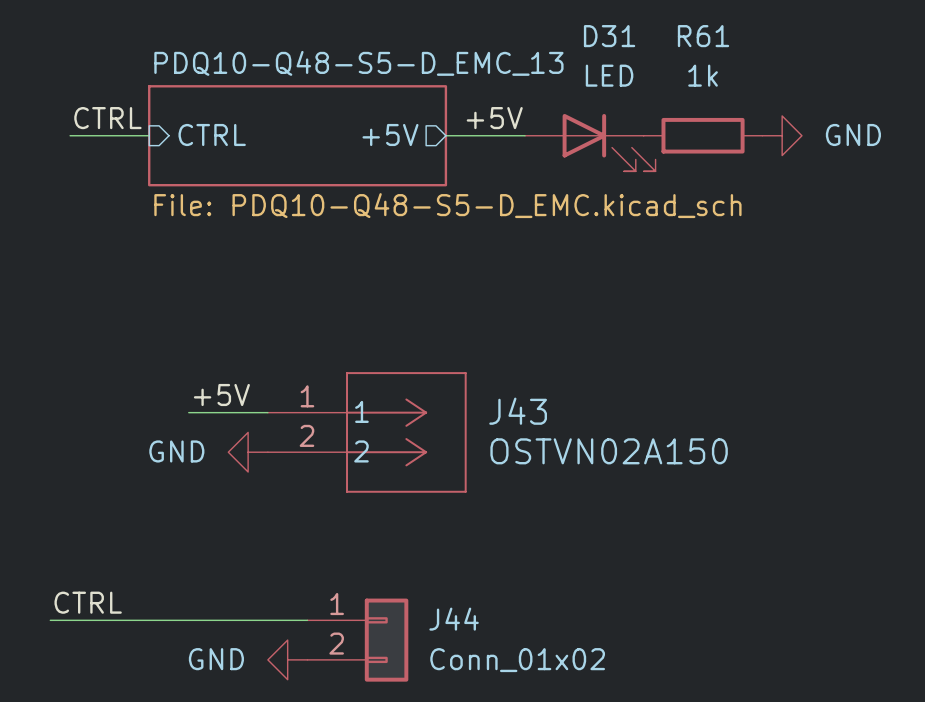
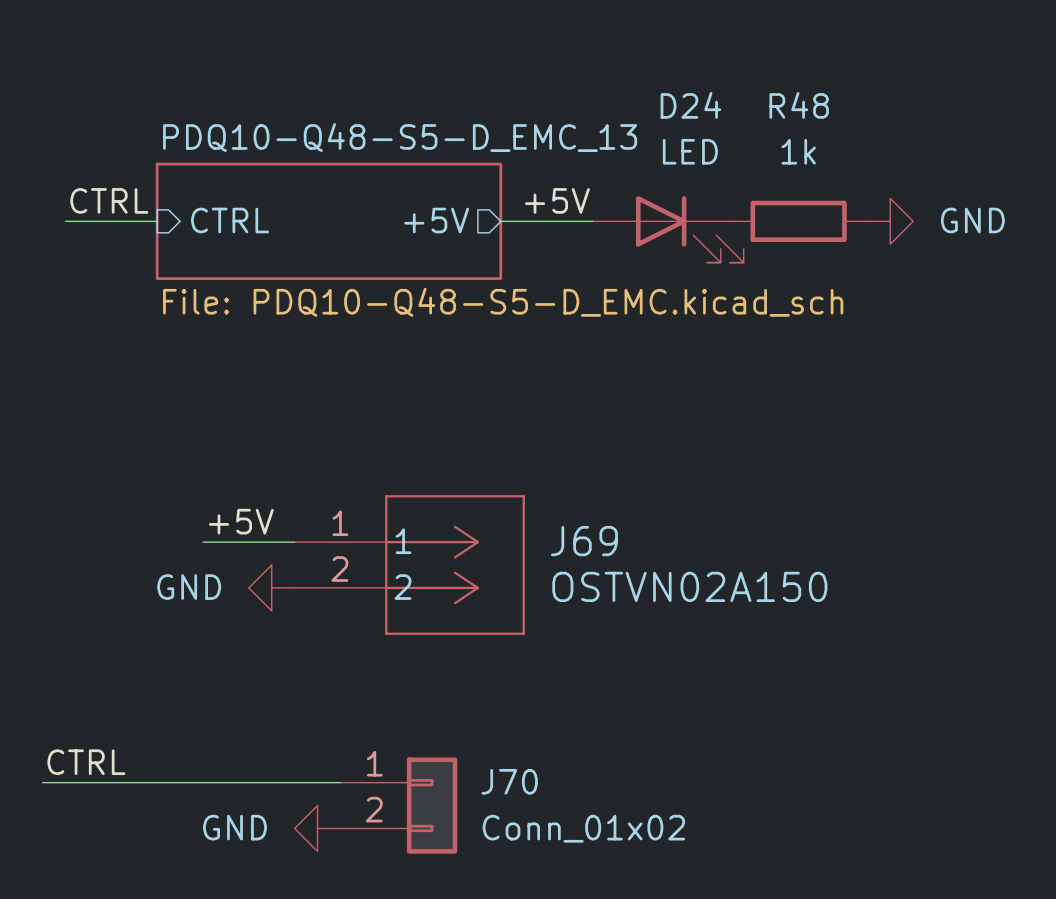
D31 name: D31 (609, 36) -> D24 (690, 105)
R61 name: R61 (703, 36) -> R48 (799, 105)
J43 name: J43 (518, 411) -> J69 (584, 541)
J44 name: J44 (454, 619) -> J70 (509, 781)

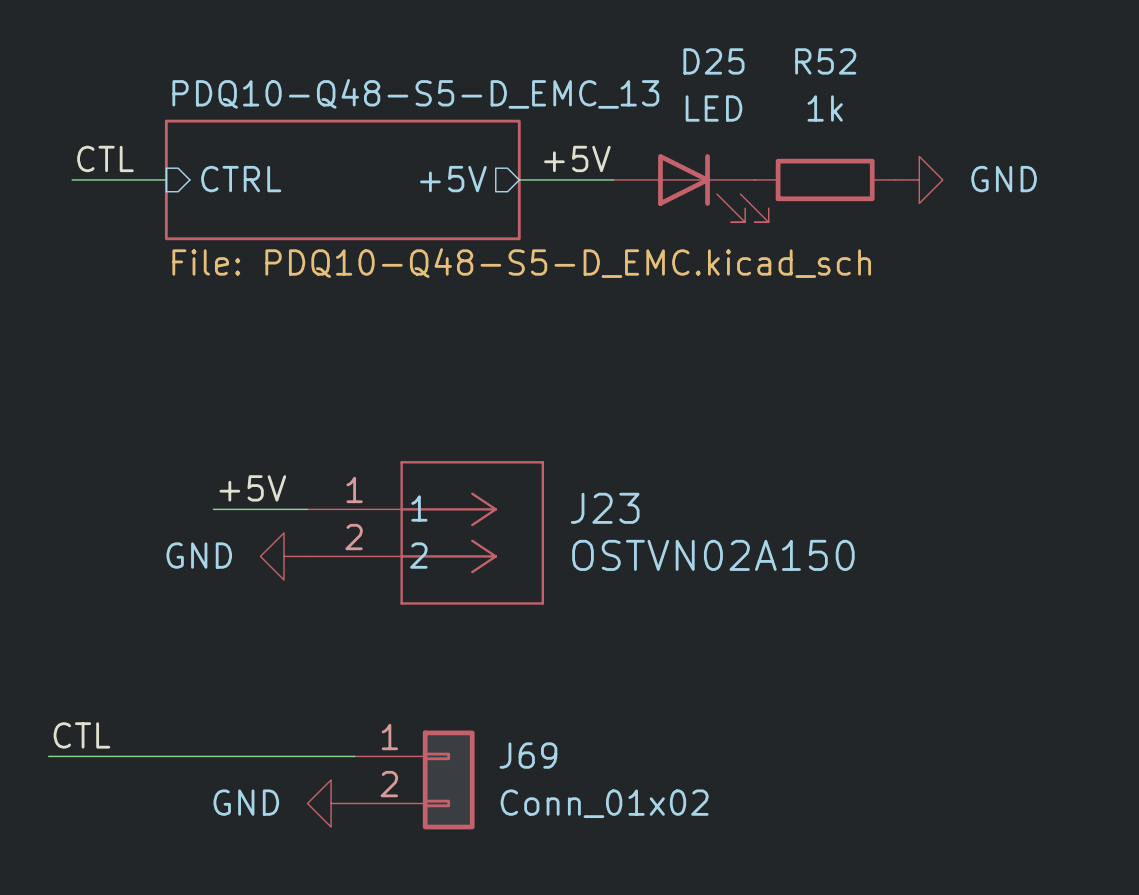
D24 name: D24 (690, 105) -> D25 (713, 61)
R48 name: R48 (799, 105) -> R52 (825, 61)
label: CTRL (109, 200) -> CTL (105, 158)
J69 name: J69 (584, 541) -> J23 (605, 508)
label: CTRL (86, 762) -> CTL (81, 735)
J70 name: J70 (509, 781) -> J69 (528, 755)

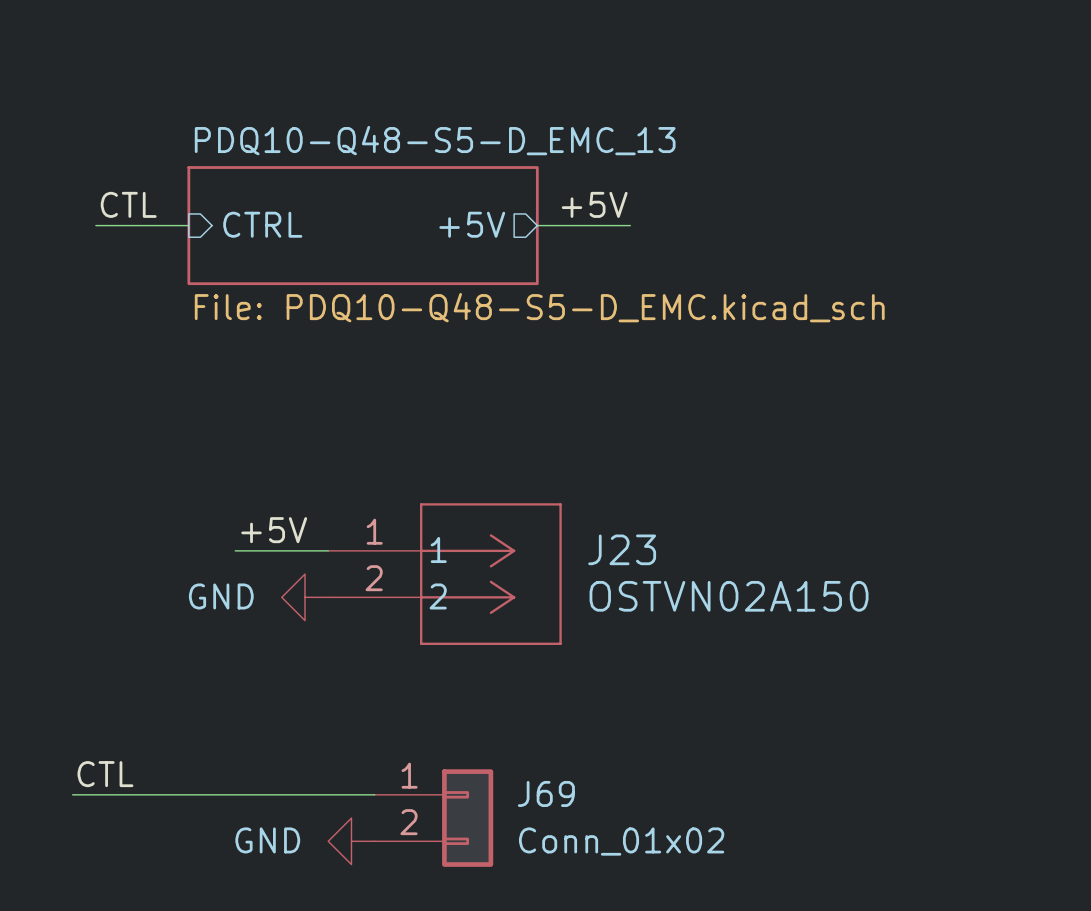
R52: 1k (825, 179) -> none
power symbol: GND (919, 179) -> none
D25: LED (691, 188) -> none

